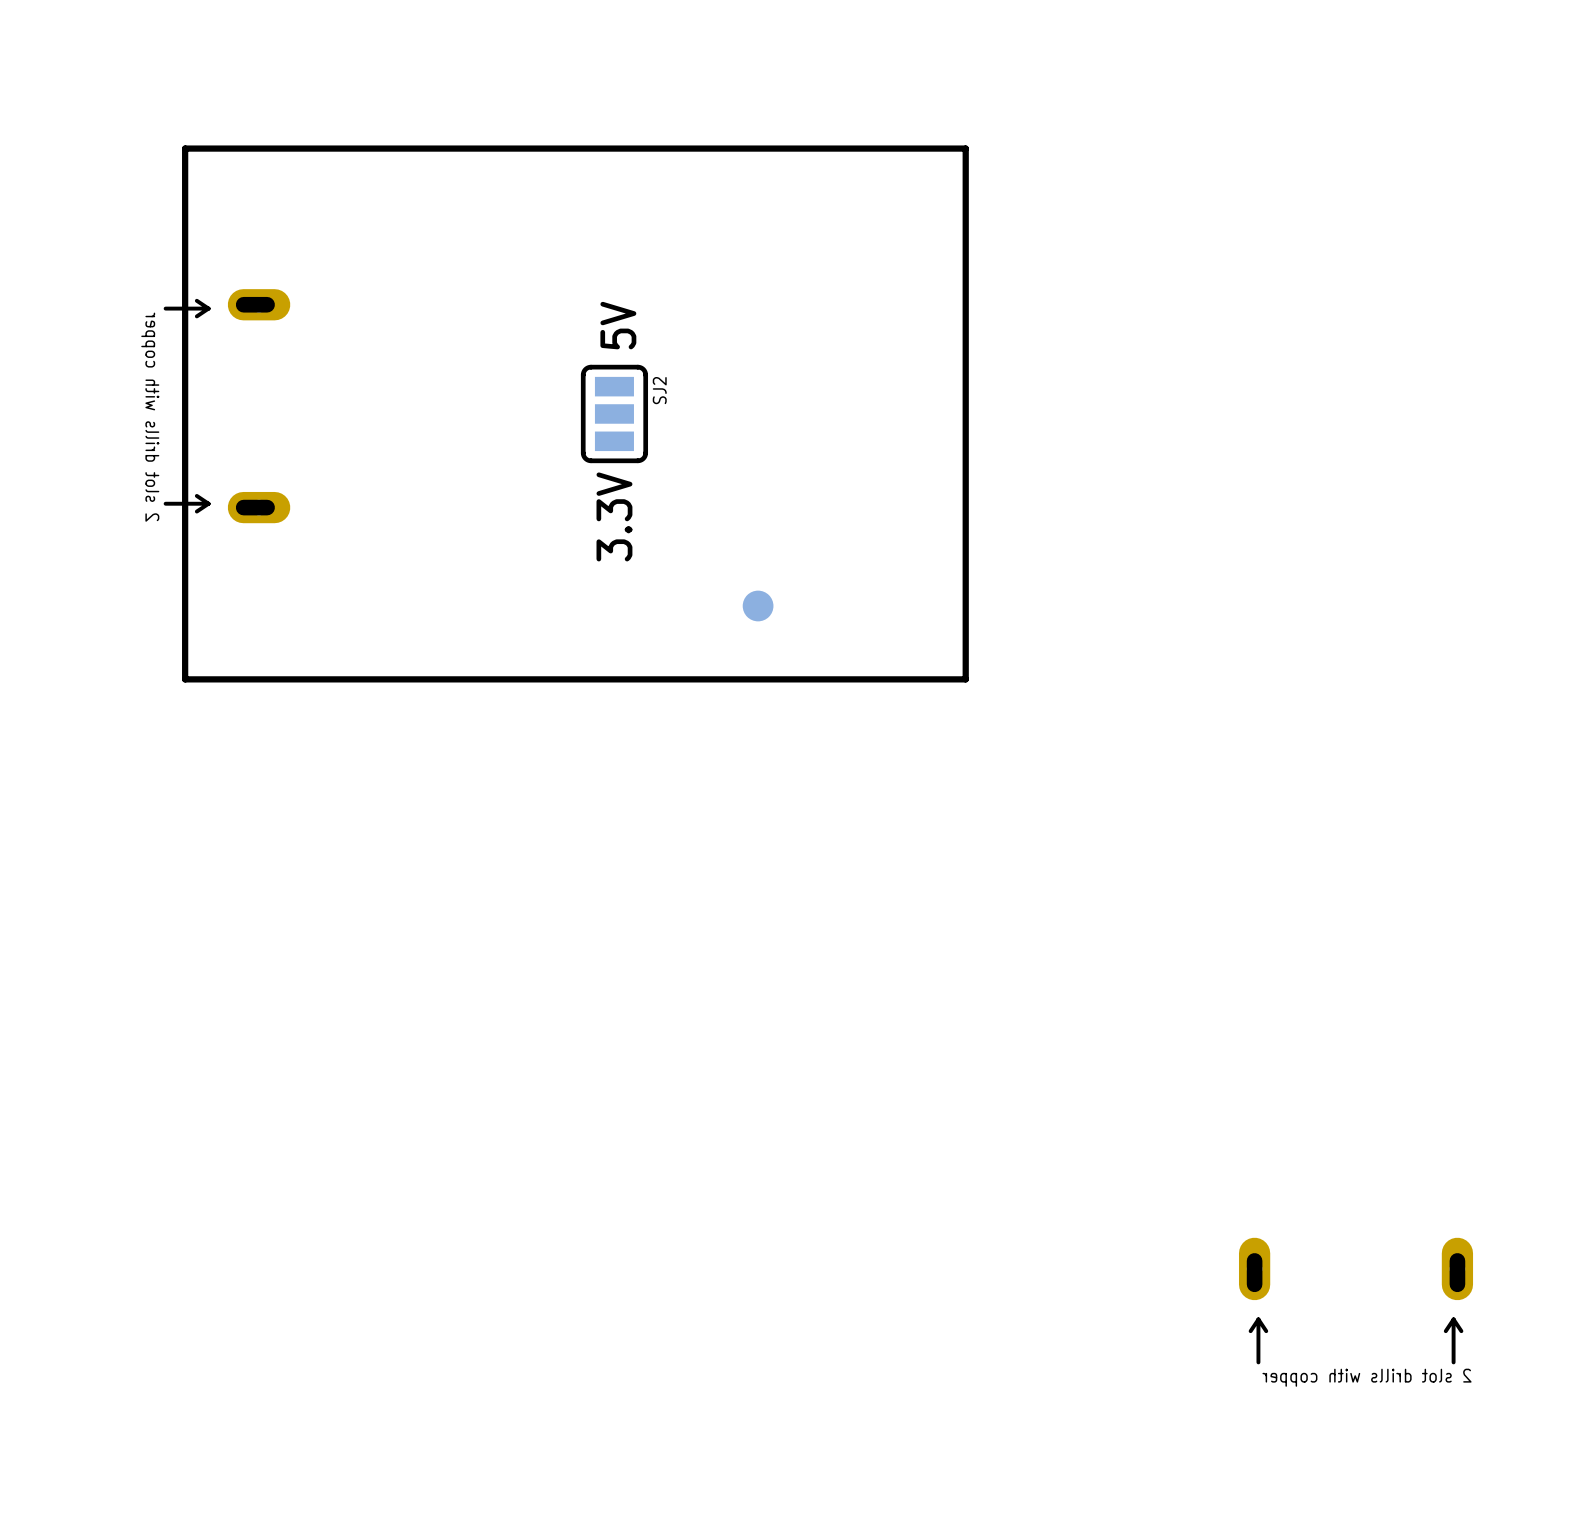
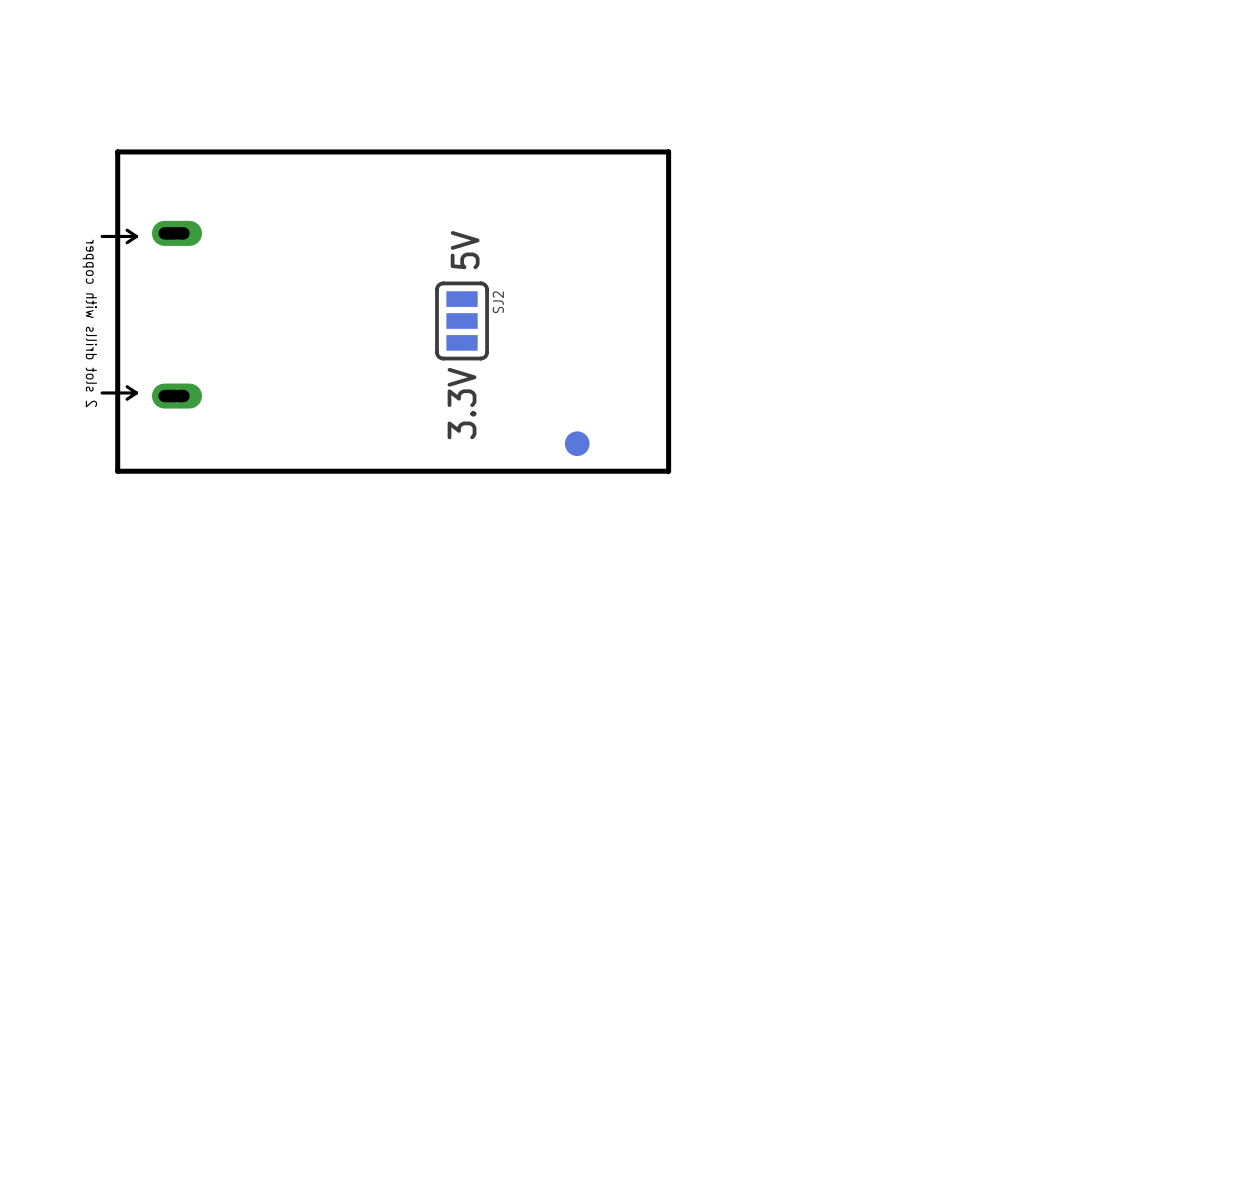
board edge: (185, 203) (185, 148) (965, 148) (965, 679) (185, 679) (185, 601) -> (117, 151) (668, 151) (668, 471) (117, 471)
part position: (758, 605) -> (577, 443)
part: (1356, 1301) -> none

